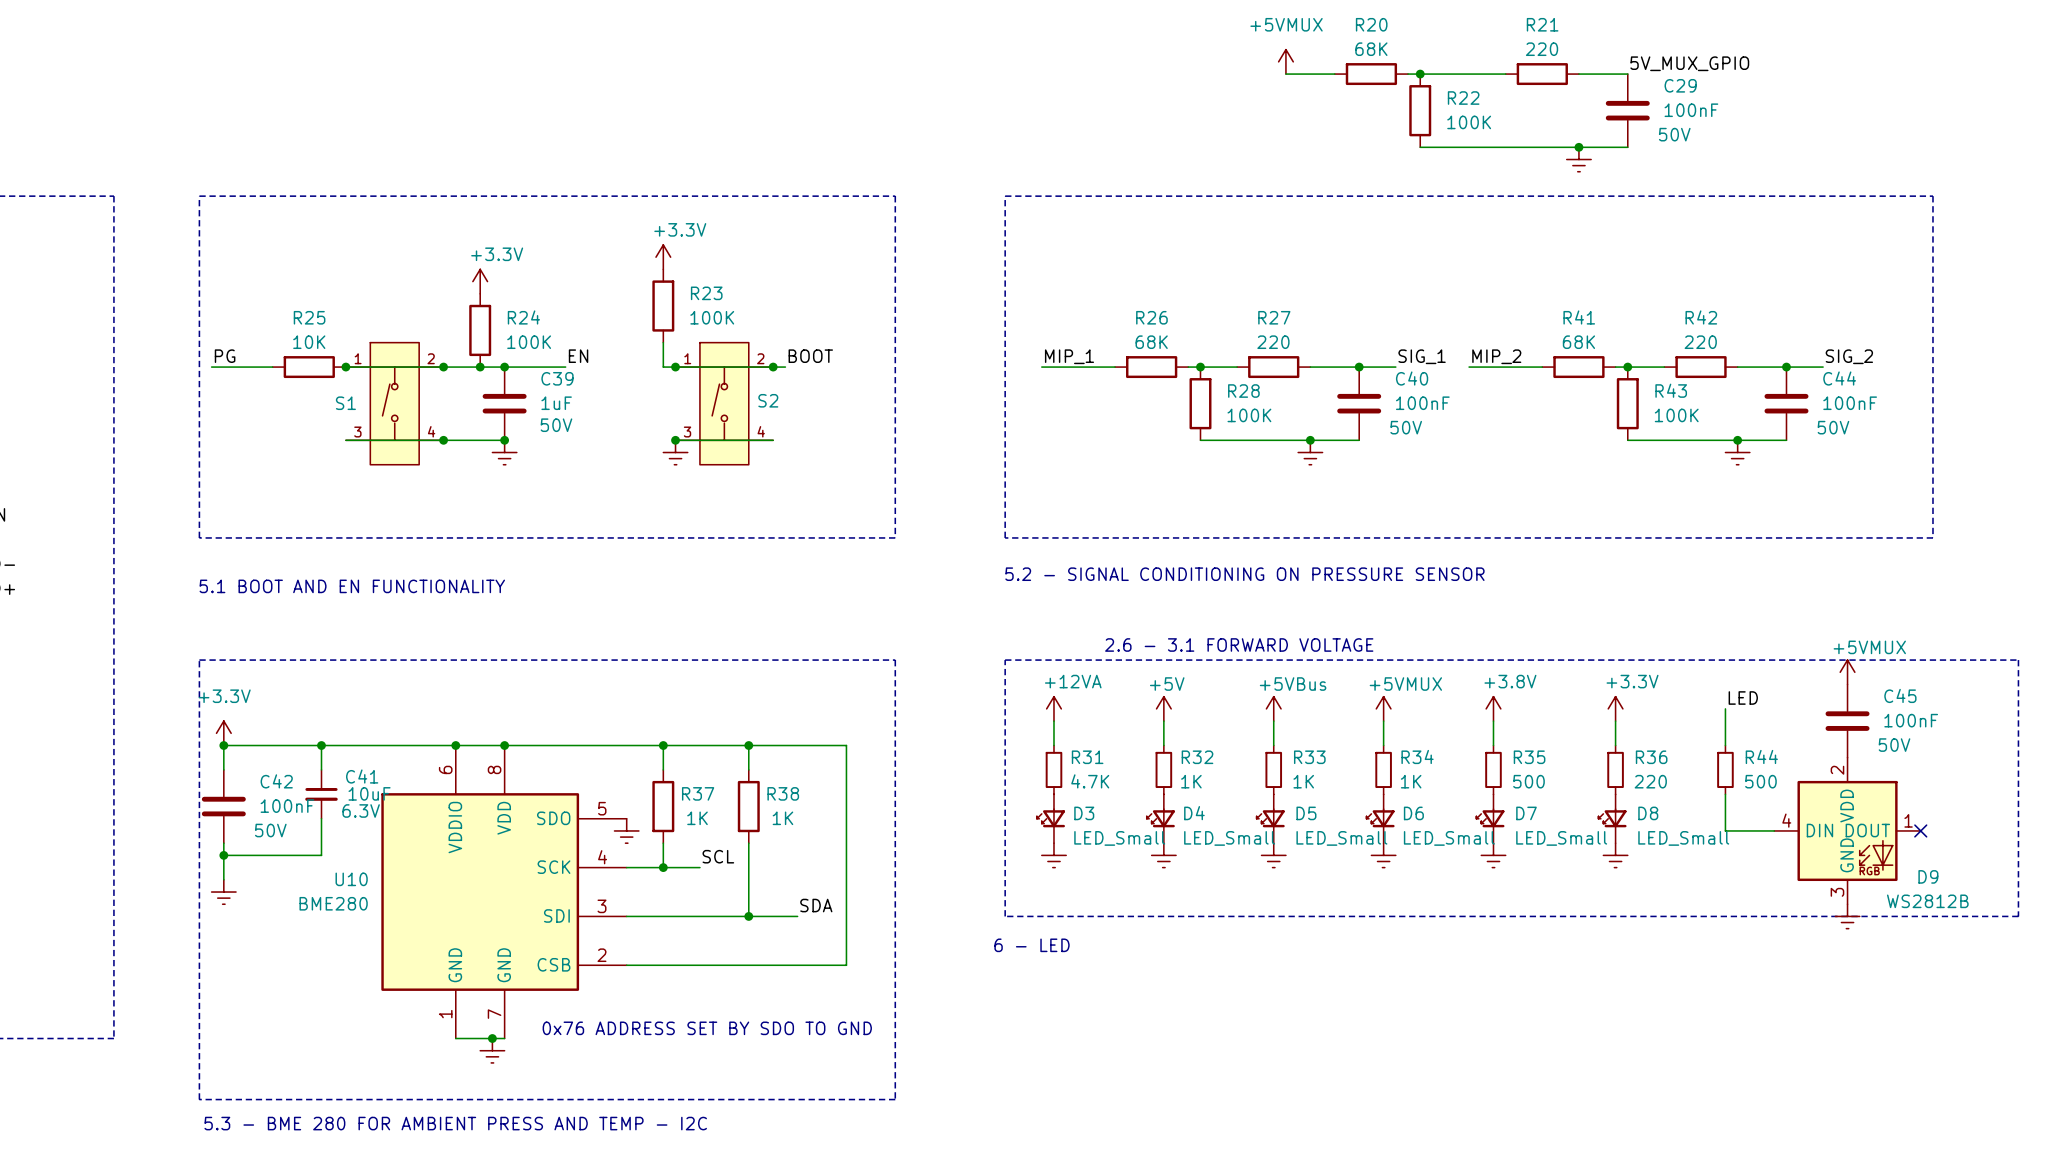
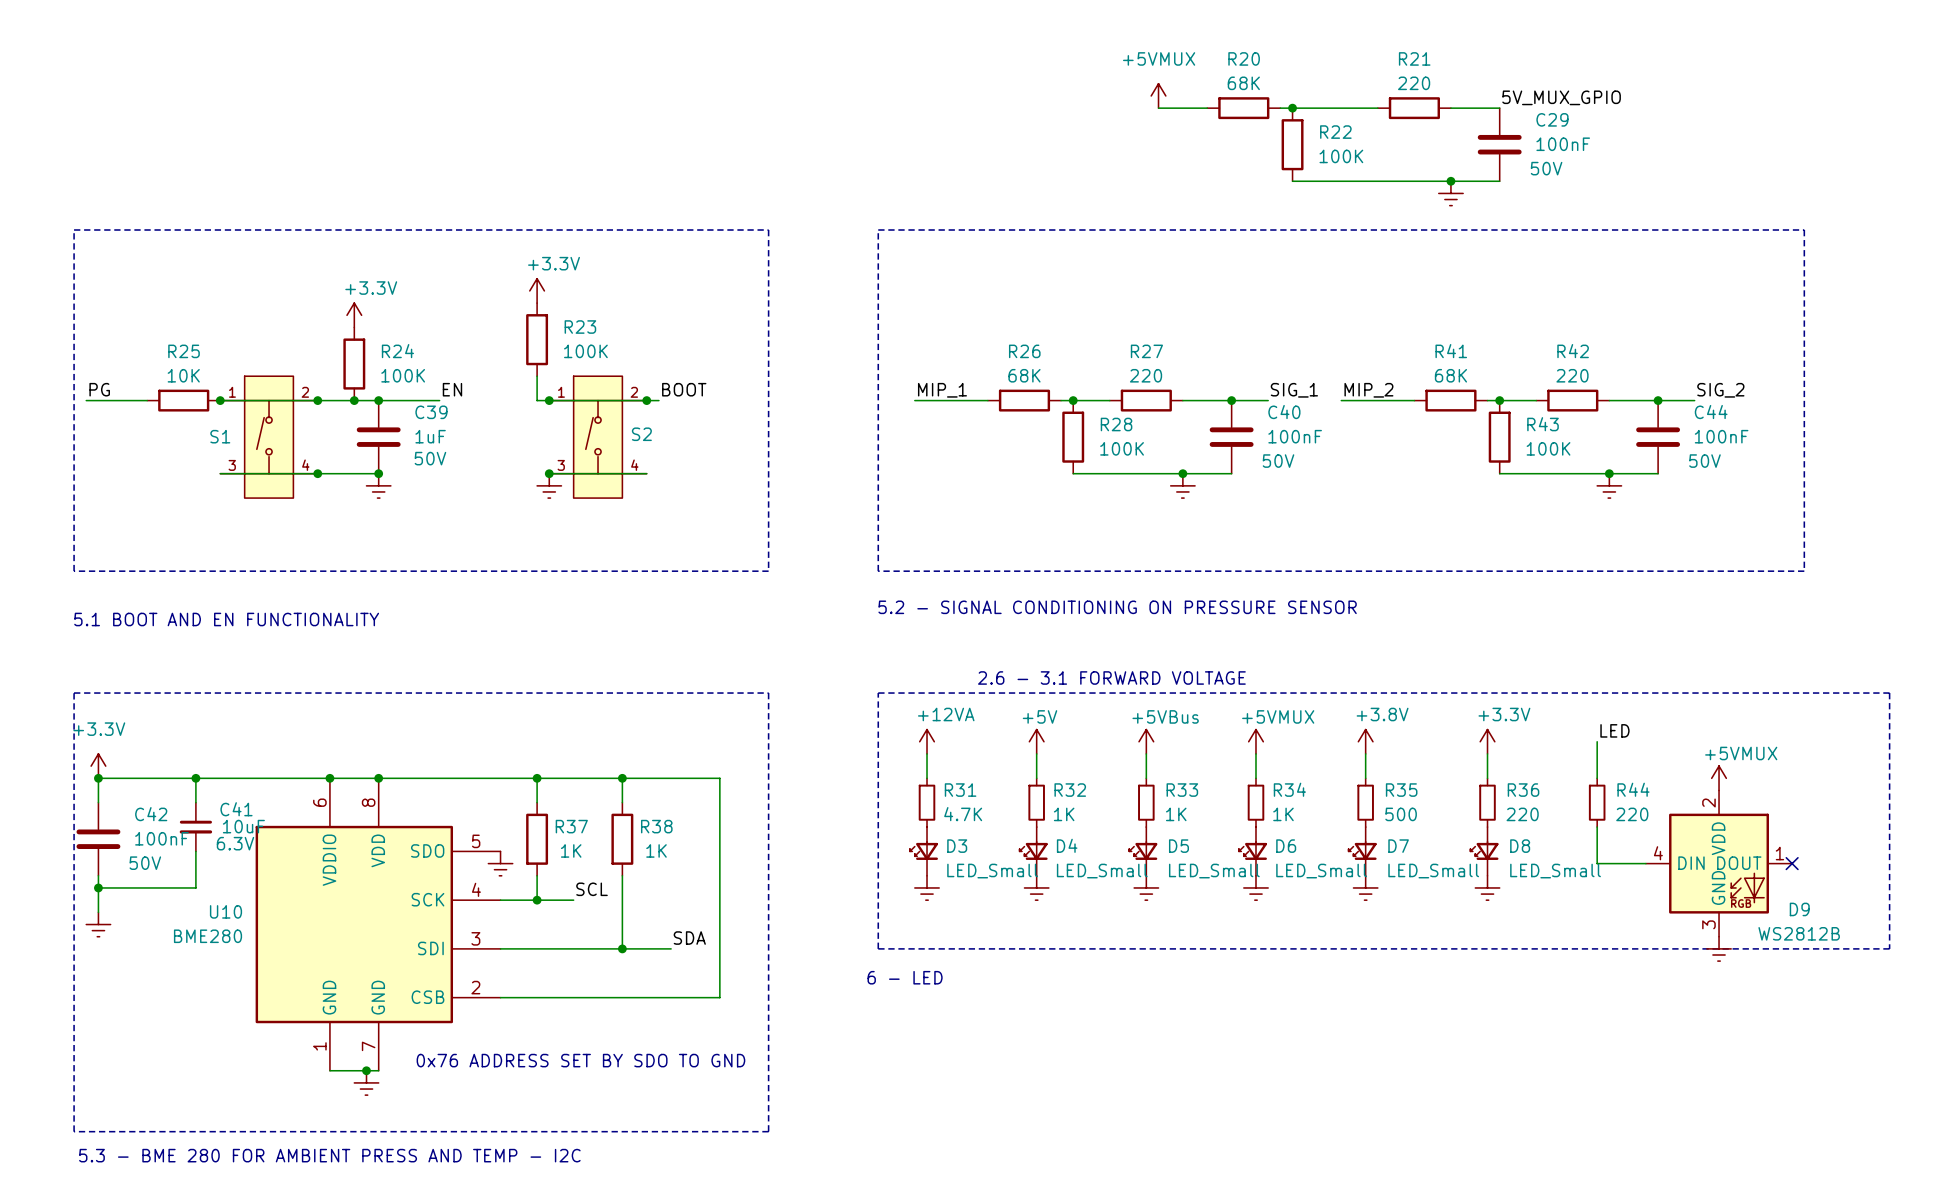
power symbol position: +5VMUX (1847, 672) -> +5VMUX (1719, 778)
C45: 100nF (1847, 721) -> none
R44 value: 500 (1760, 781) -> 220 (1632, 814)

